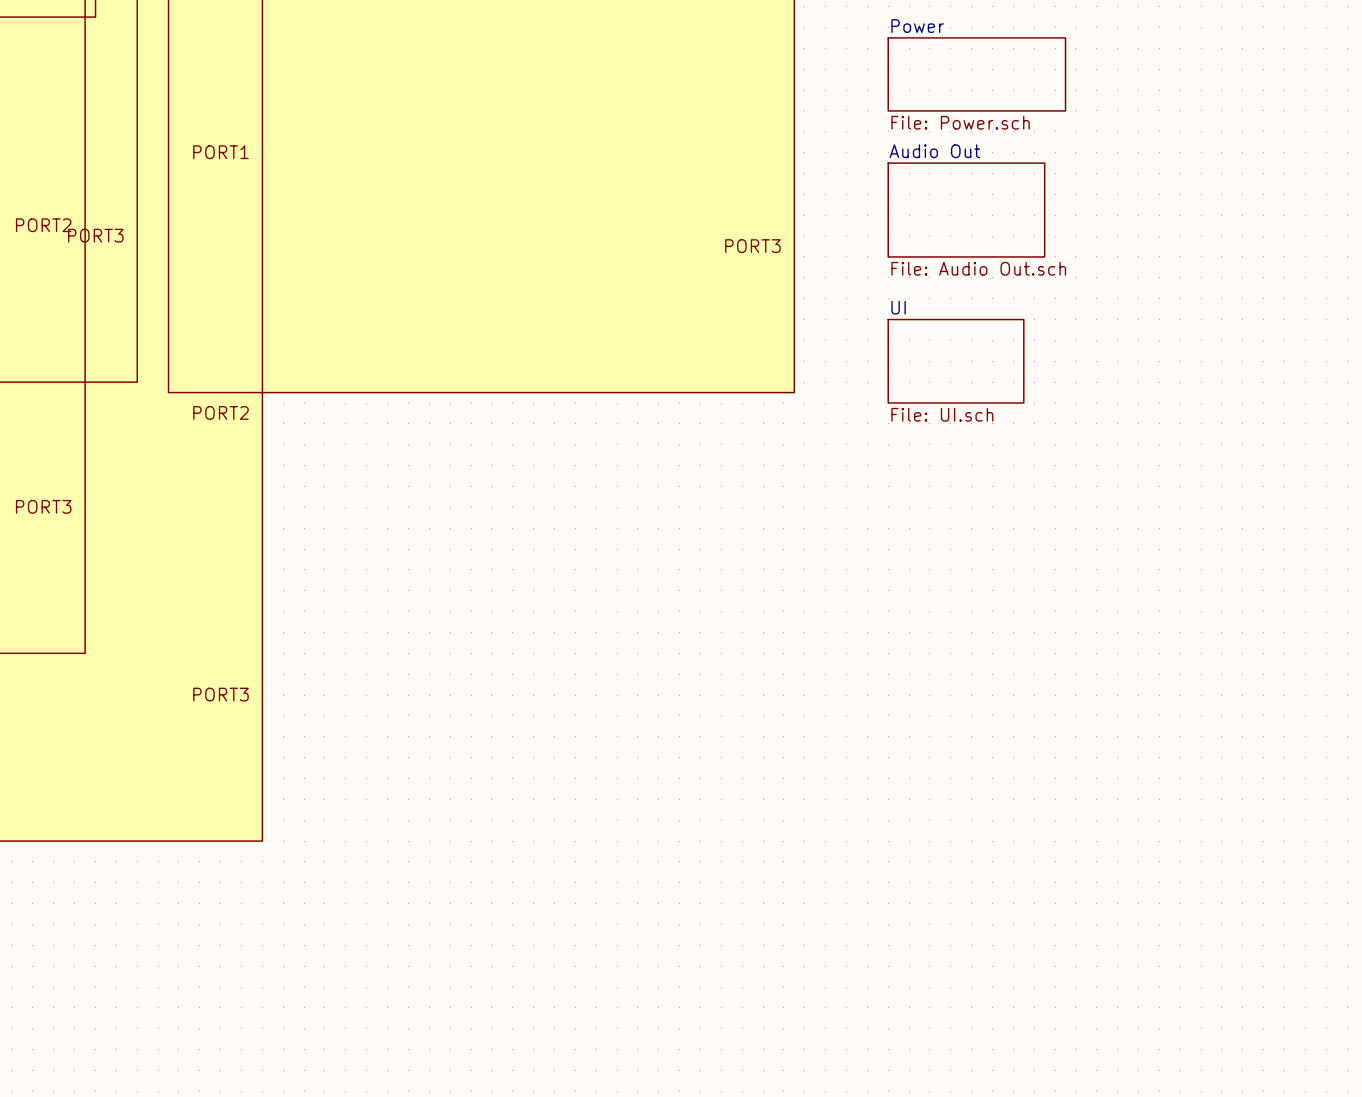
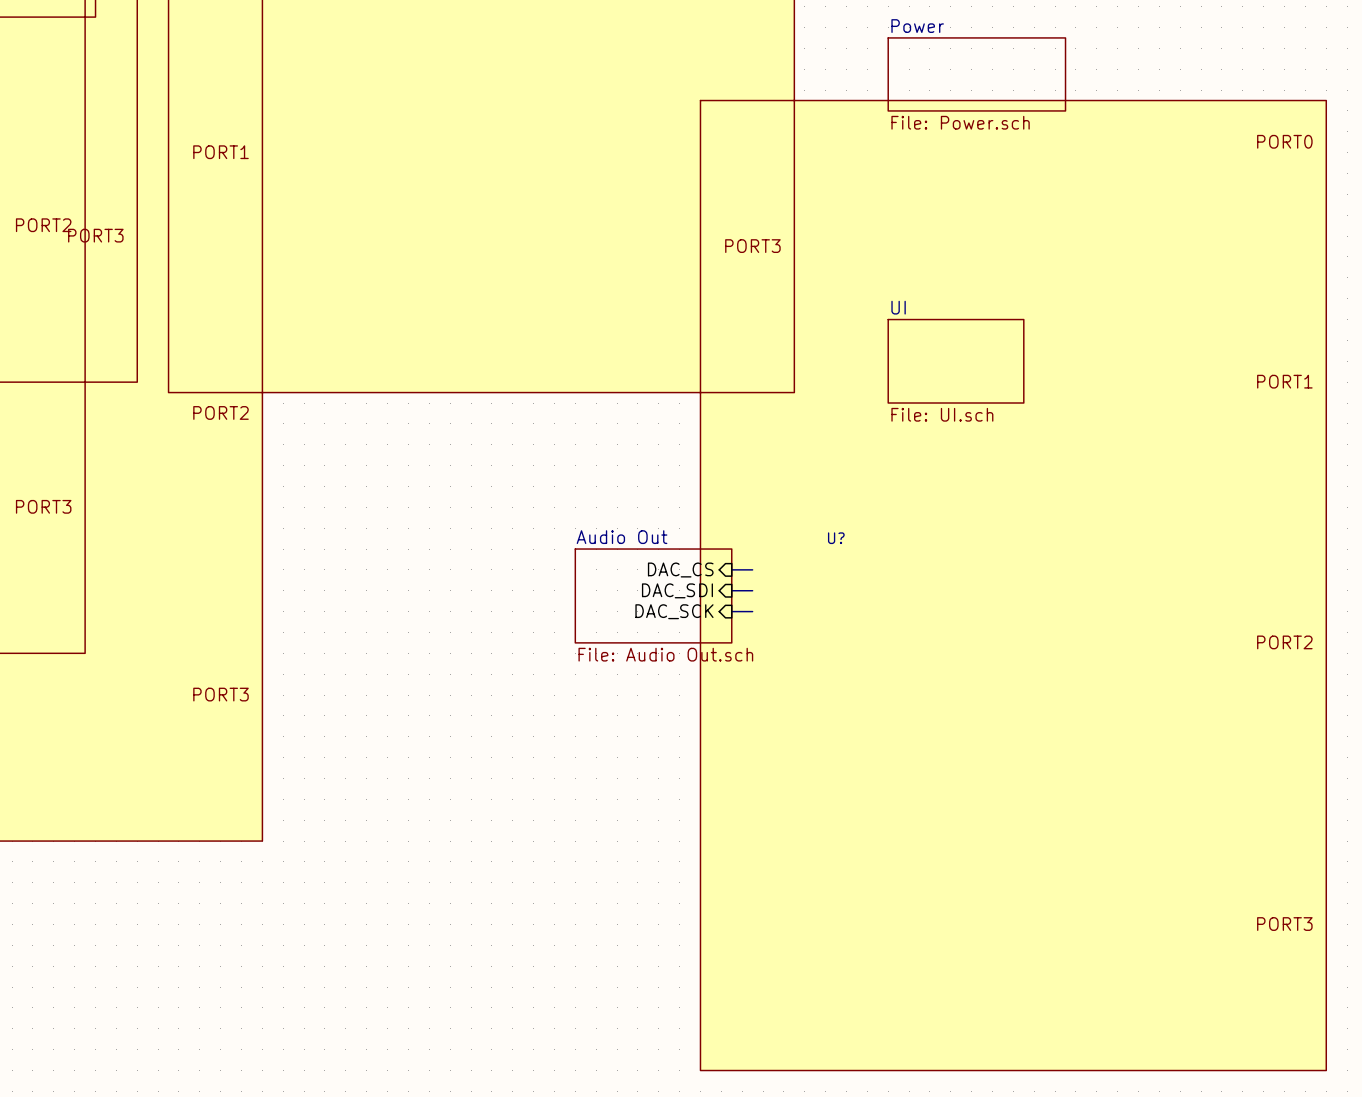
sheet Audio Out: File: Audio Out.sch (966, 210) -> none
wire: none -> (731, 569) (752, 569)
sheet pin: none -> DAC_CS (680, 570)
U?: none -> (1013, 585)
sheet pin: none -> DAC_SDI (677, 590)
wire: none -> (731, 590) (752, 590)
sheet Audio Out: none -> File: Audio Out.sch (653, 595)
sheet pin: none -> DAC_SCK (674, 611)
wire: none -> (731, 611) (752, 611)

